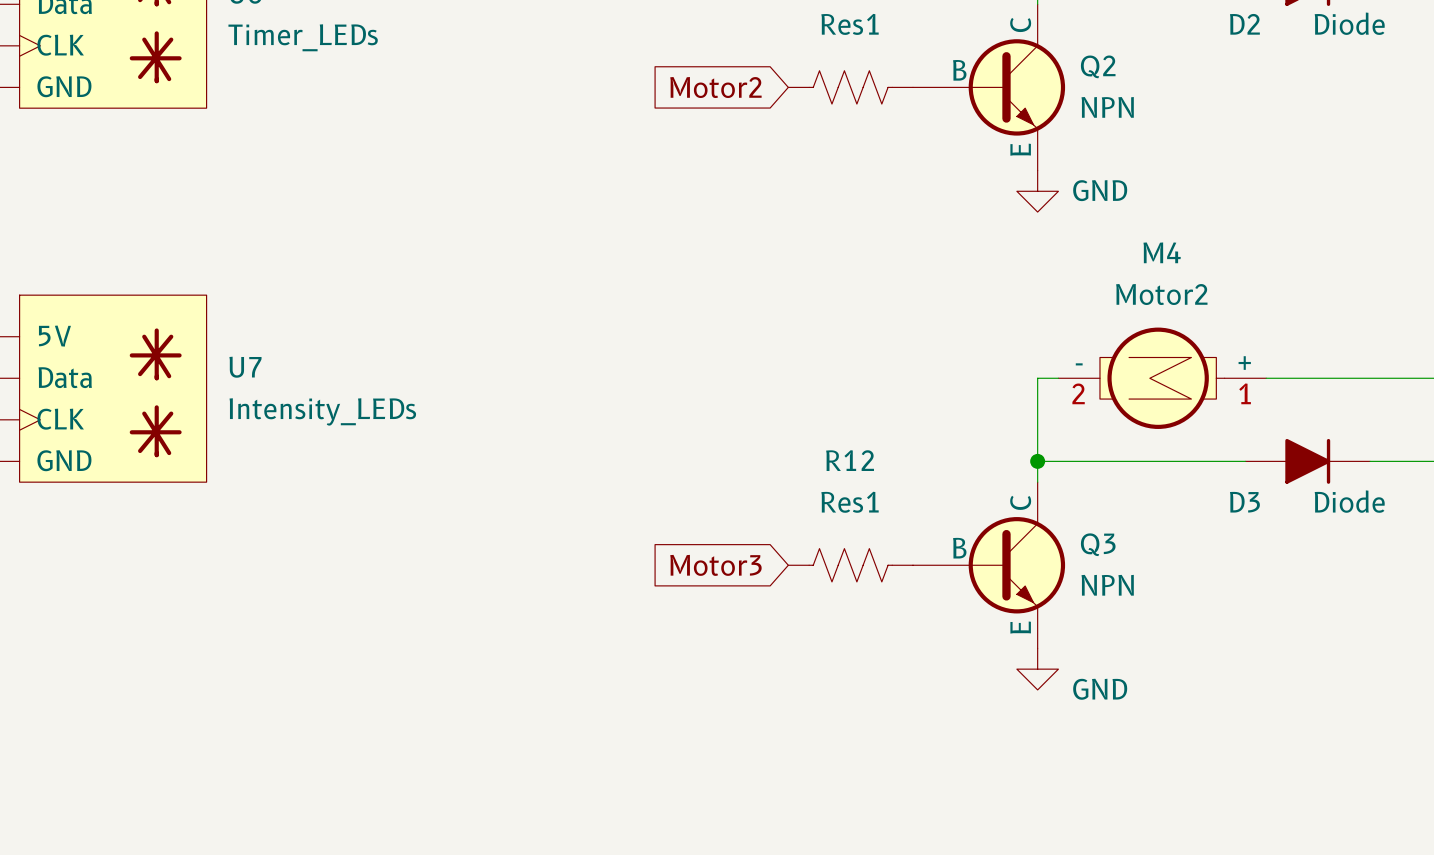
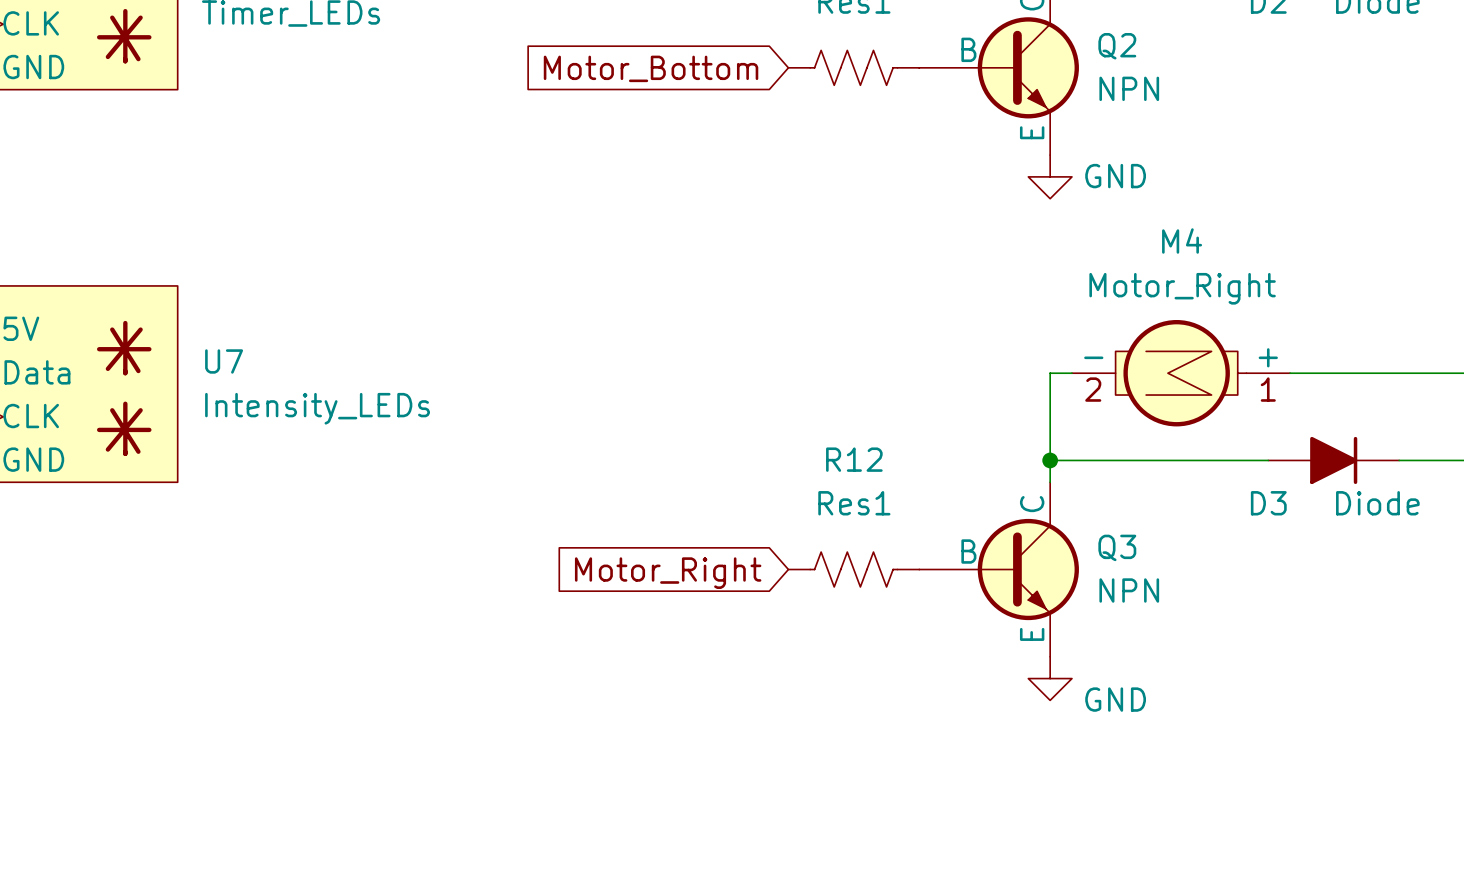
global label: Motor2 (715, 87) -> Motor_Bottom (651, 68)
M4 value: Motor2 (1161, 294) -> Motor_Right (1182, 288)
global label: Motor3 (715, 565) -> Motor_Right (668, 573)

